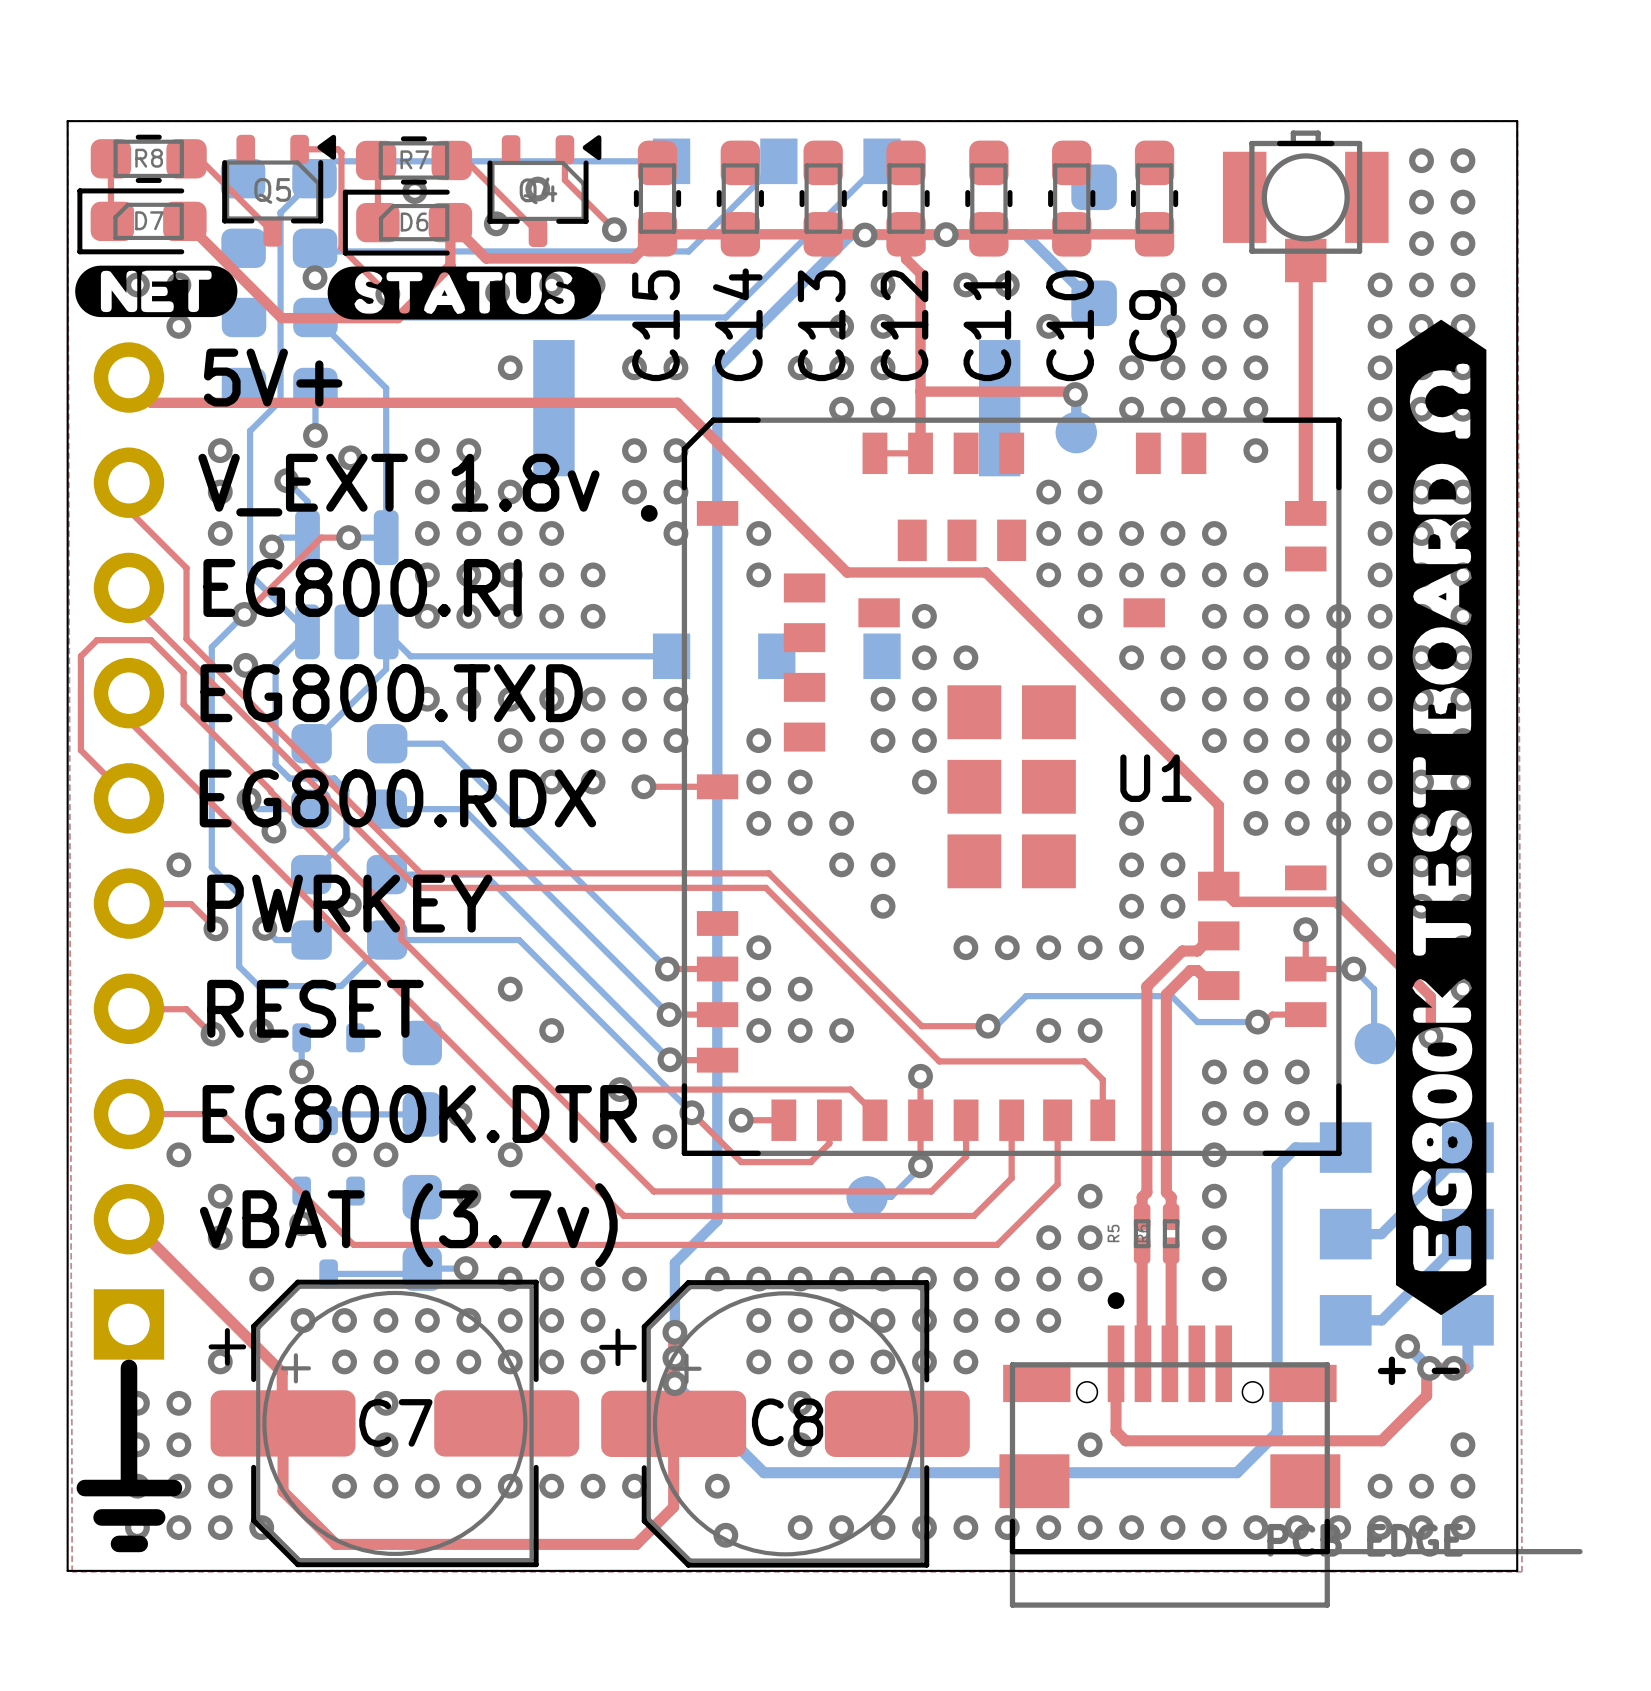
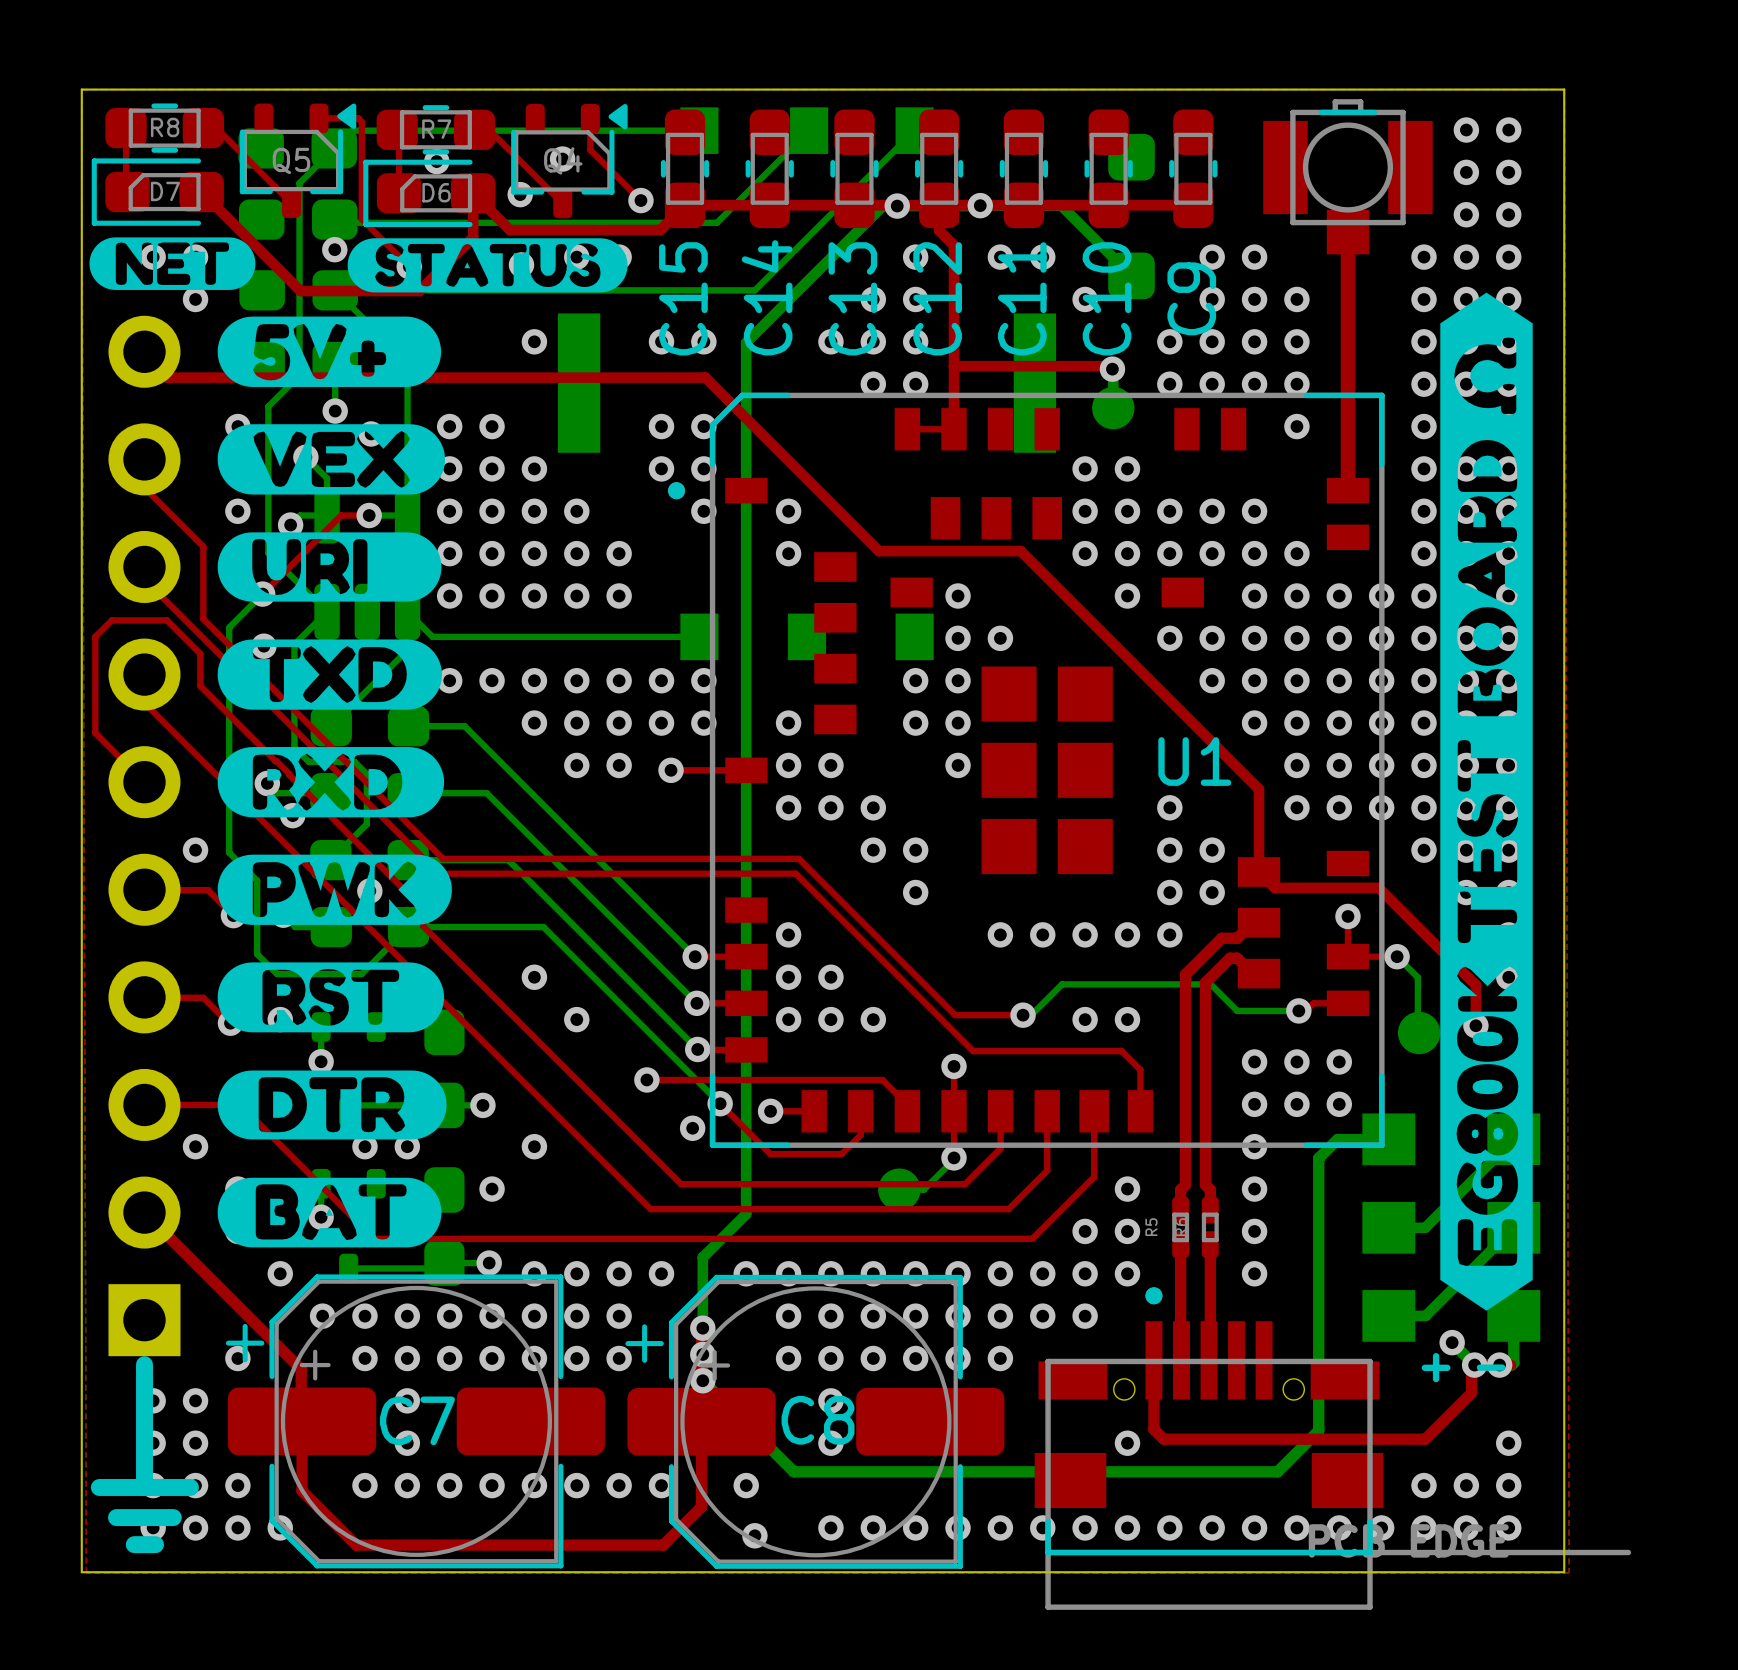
drawing: none -> [217, 316, 452, 1248]
text: 5V+ (273, 377) -> none
text: V_EXT 1.8v (398, 485) -> none
text: EG800.RI (362, 587) -> none
text: EG800.TXD (391, 693) -> none
text: EG800.RDX (397, 798) -> none
text: PWRKEY (349, 903) -> none
text: RESET (315, 1008) -> none
text: EG800K.DTR (419, 1114) -> none
text: vBAT (3.7v) (408, 1225) -> none

